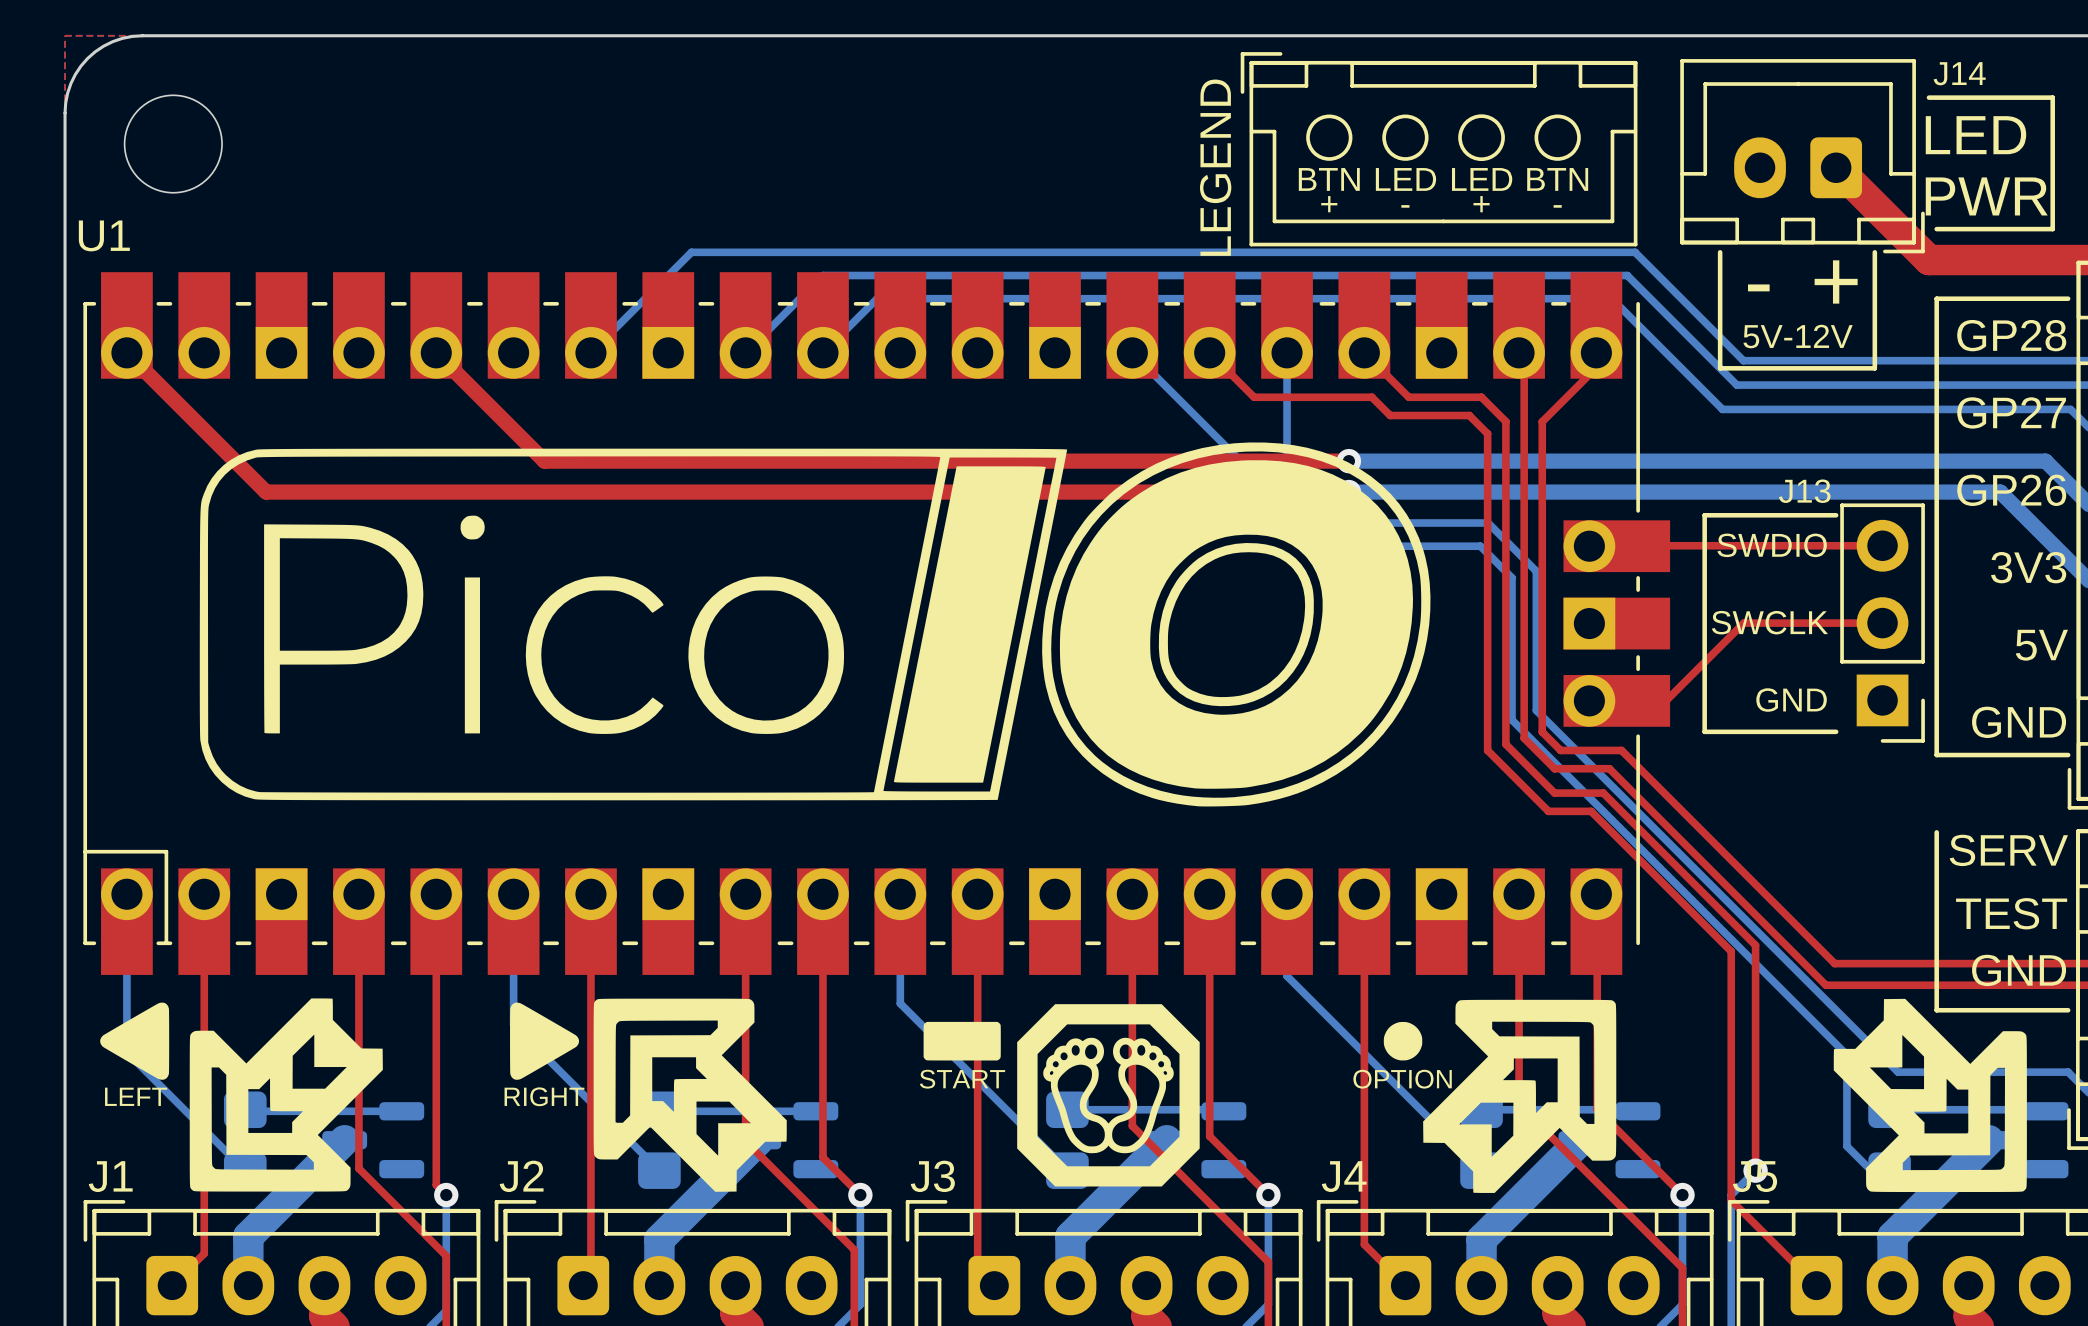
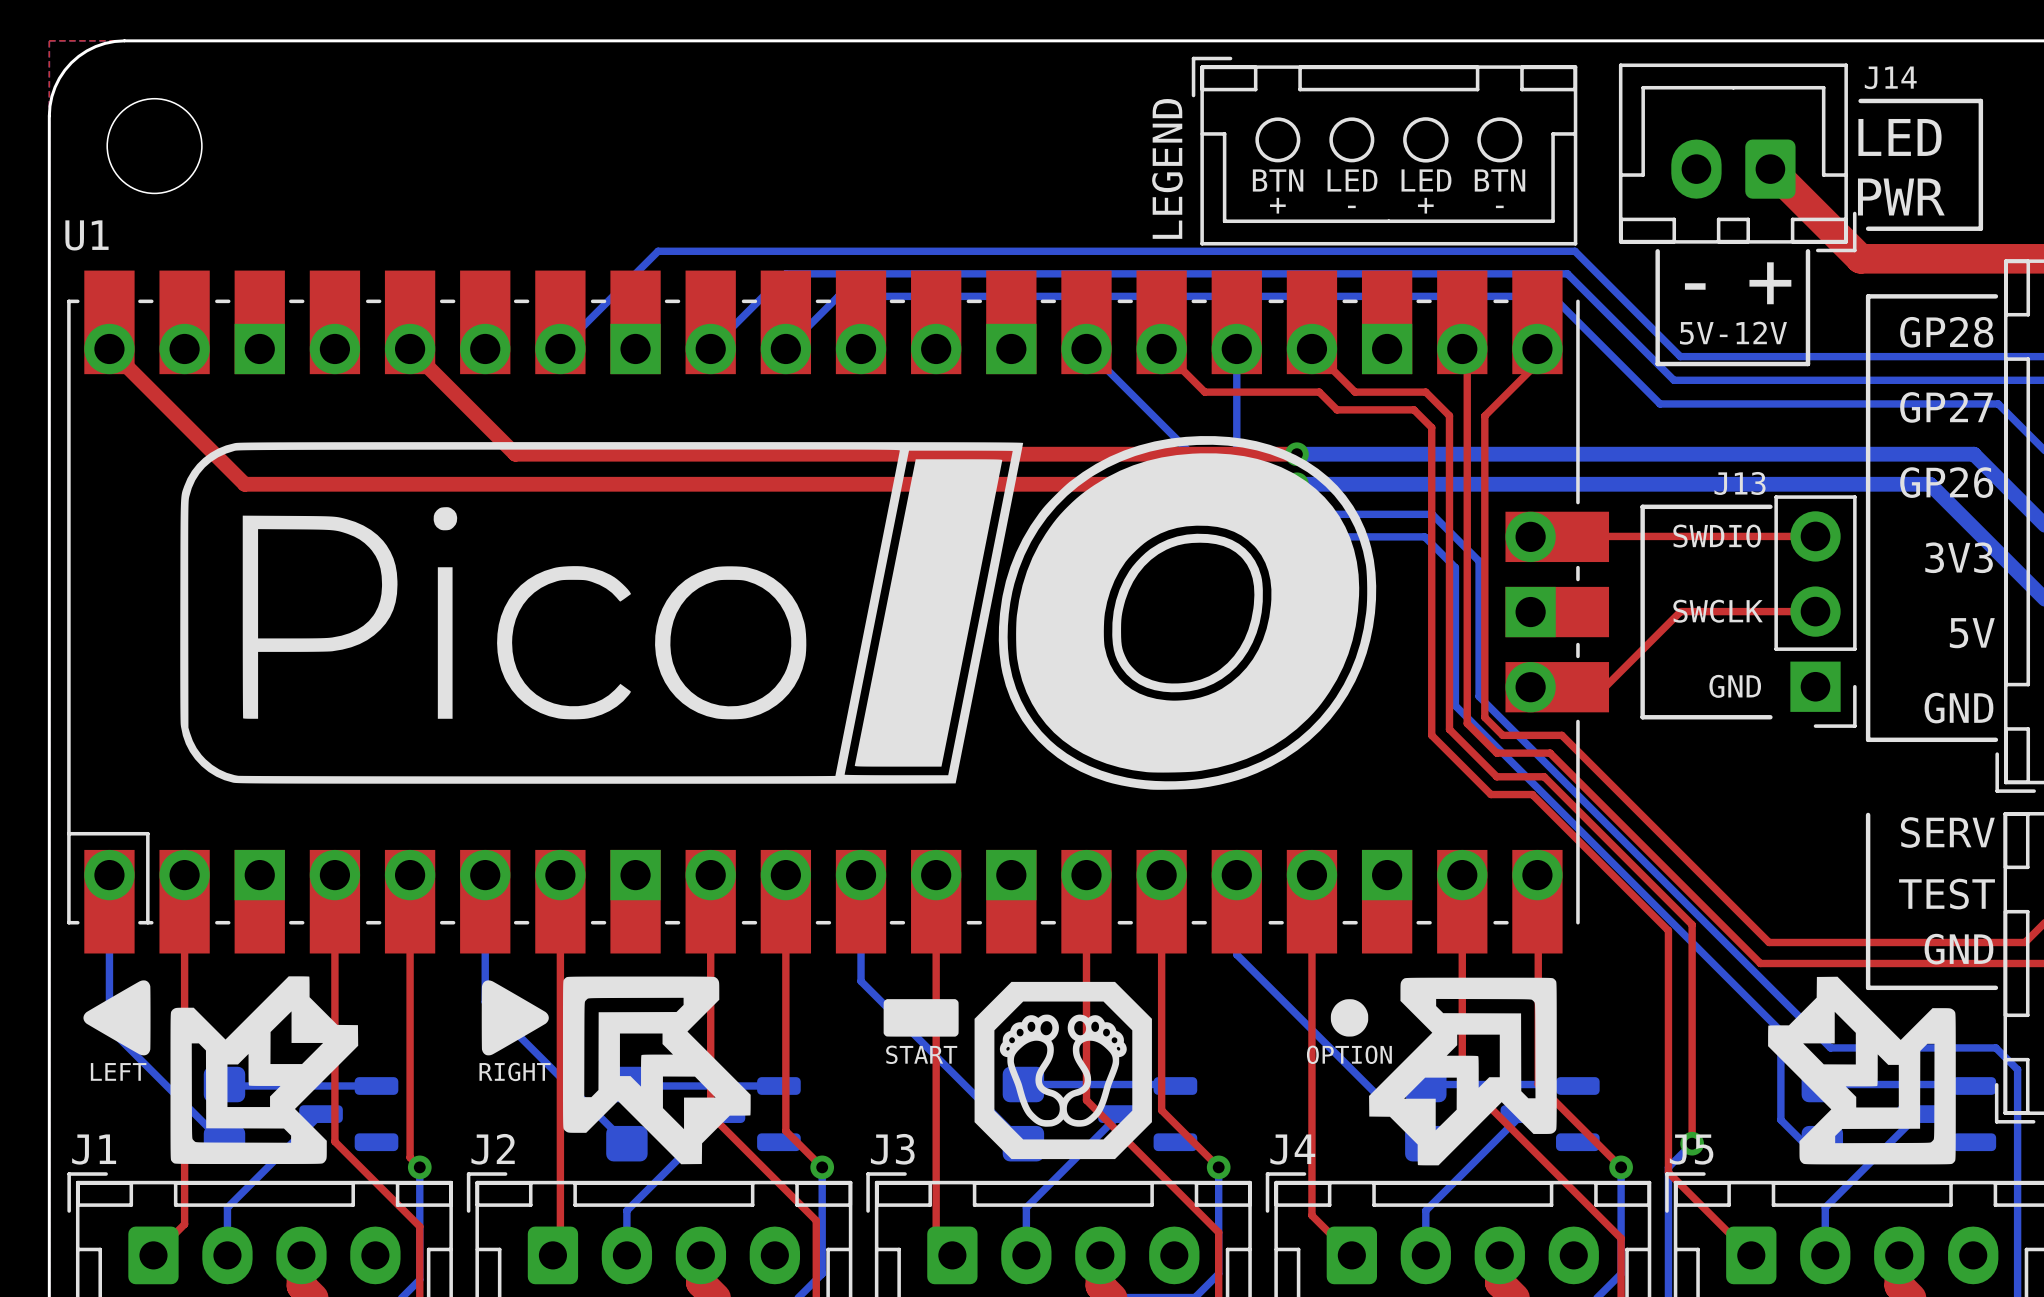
bottom track width: thick (344, 1140) (248, 1236) (248, 1285) -> thin (321, 1114) (227, 1207) (227, 1255)
bottom track width: thick (758, 1140) (659, 1239) (659, 1285) -> thin (723, 1114) (626, 1210) (626, 1255)
bottom track width: thick (1166, 1140) (1070, 1236) (1070, 1285) -> thin (1119, 1114) (1026, 1207) (1026, 1255)
bottom track width: thick (1580, 1140) (1481, 1239) (1481, 1285) -> thin (1522, 1114) (1425, 1210) (1425, 1255)
bottom track width: thick (1988, 1140) (1892, 1236) (1892, 1285) -> thin (1918, 1114) (1825, 1207) (1825, 1255)

